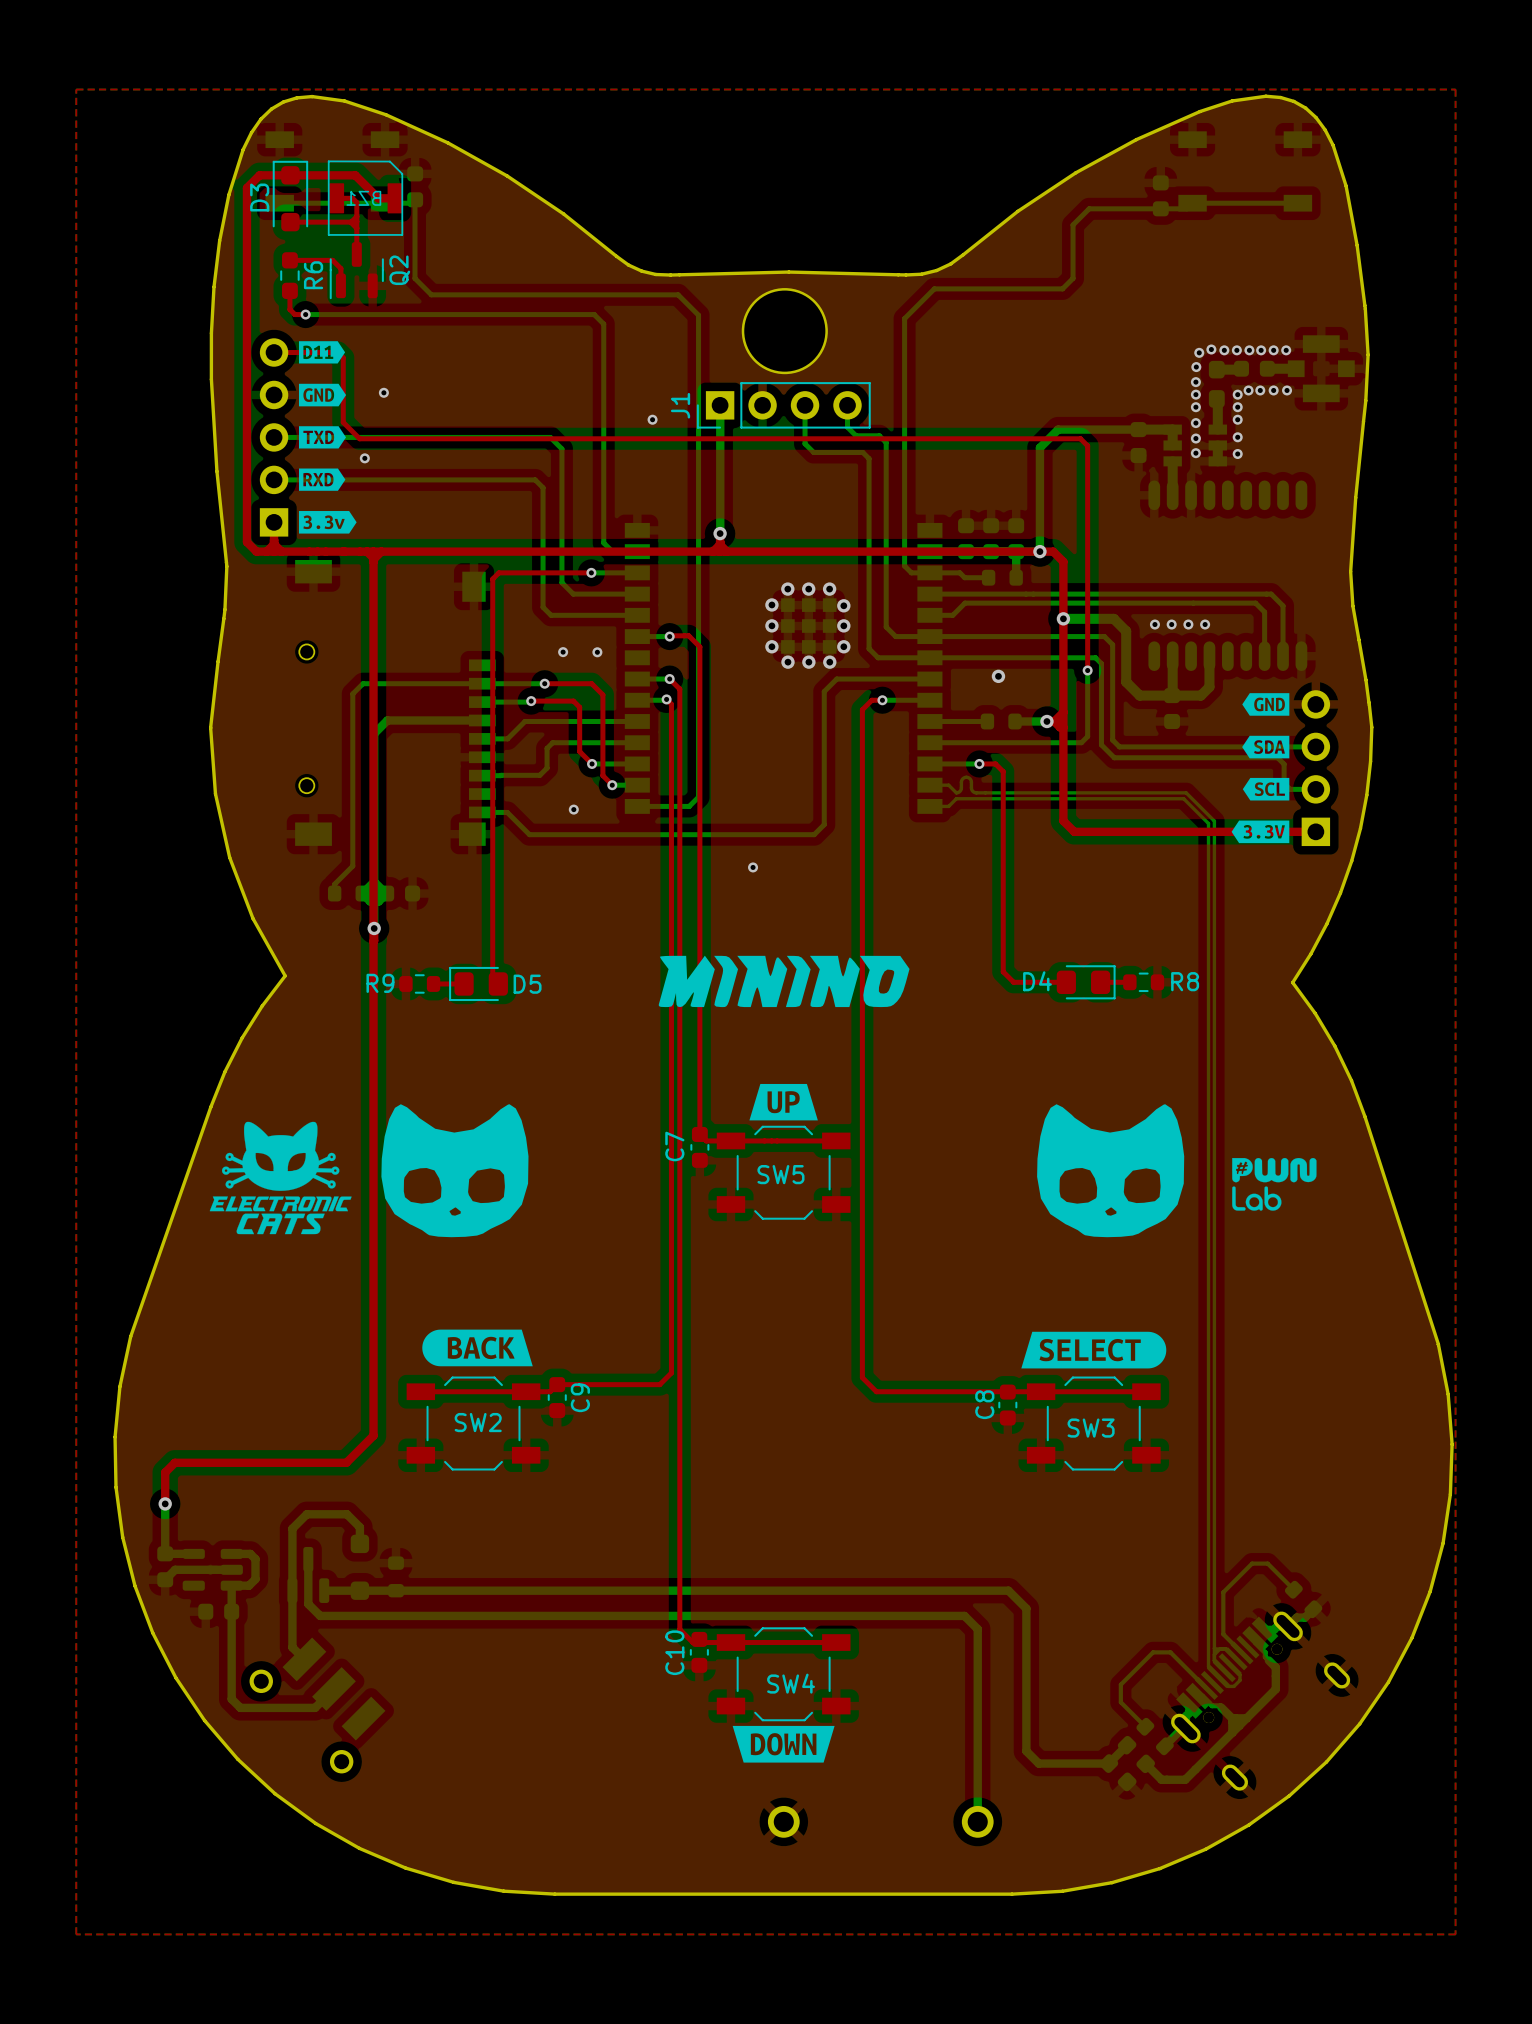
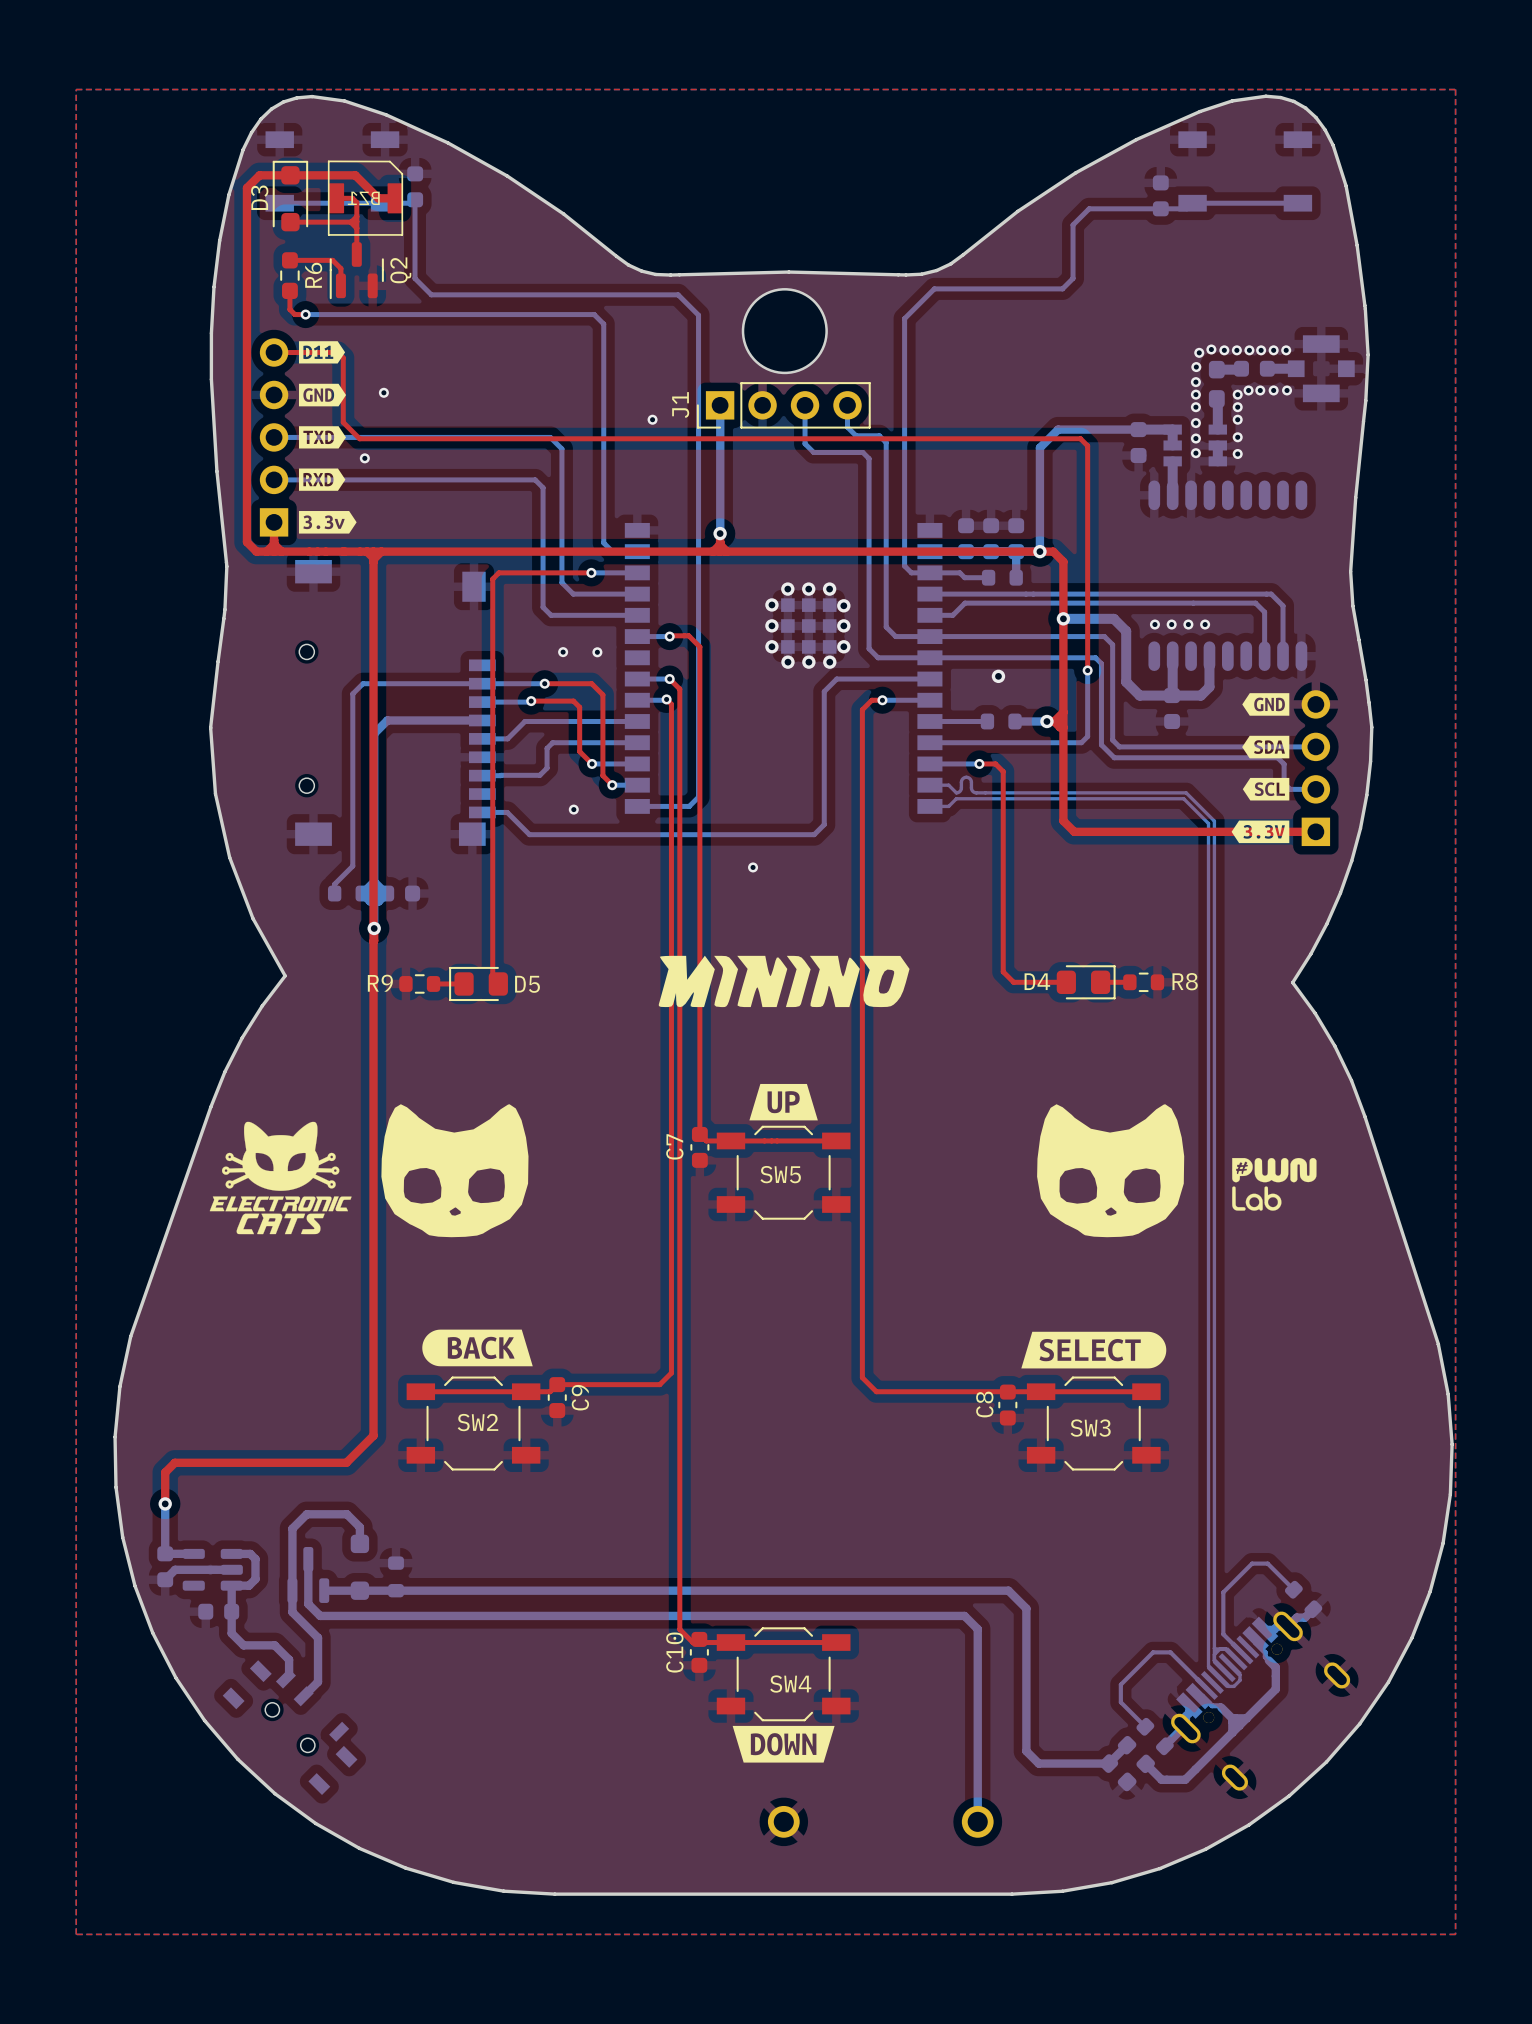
bottom track: (292, 1612) (292, 1647) (304, 1659) -> (292, 1612) (318, 1637) (318, 1681) (303, 1696)
bottom track: (231, 1633) (231, 1699) (240, 1707) (315, 1707) (333, 1689) -> (231, 1633) (243, 1645) (274, 1645) (289, 1659) (289, 1675) (285, 1678)
part: (317, 1705) -> none
part: none -> (290, 1727)

